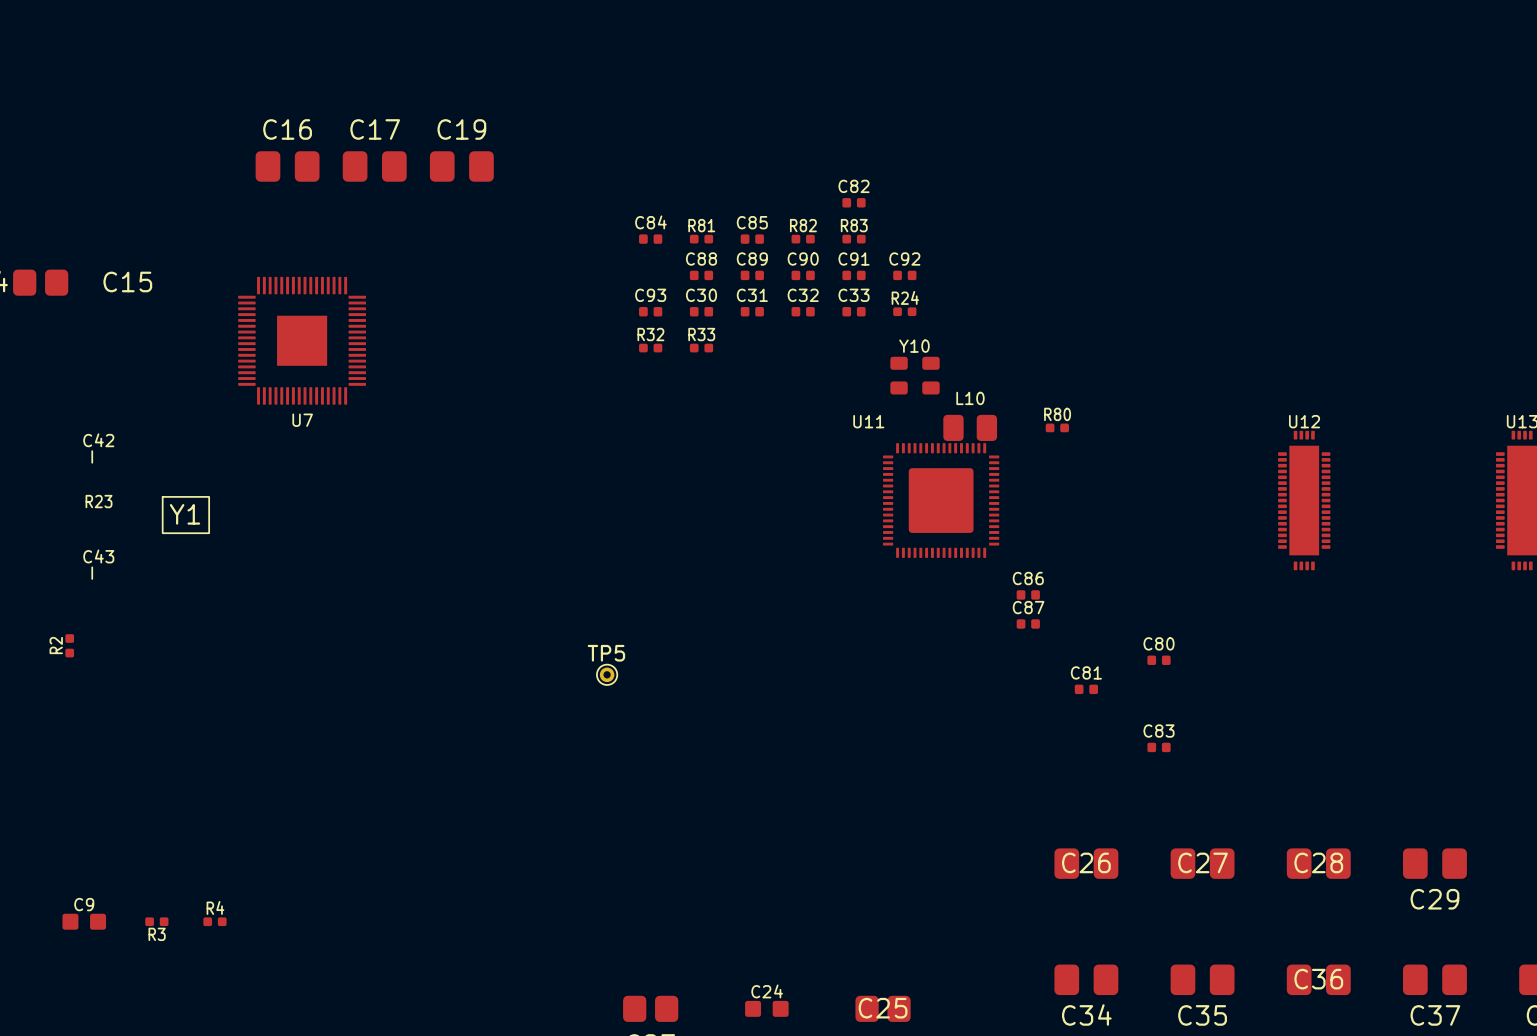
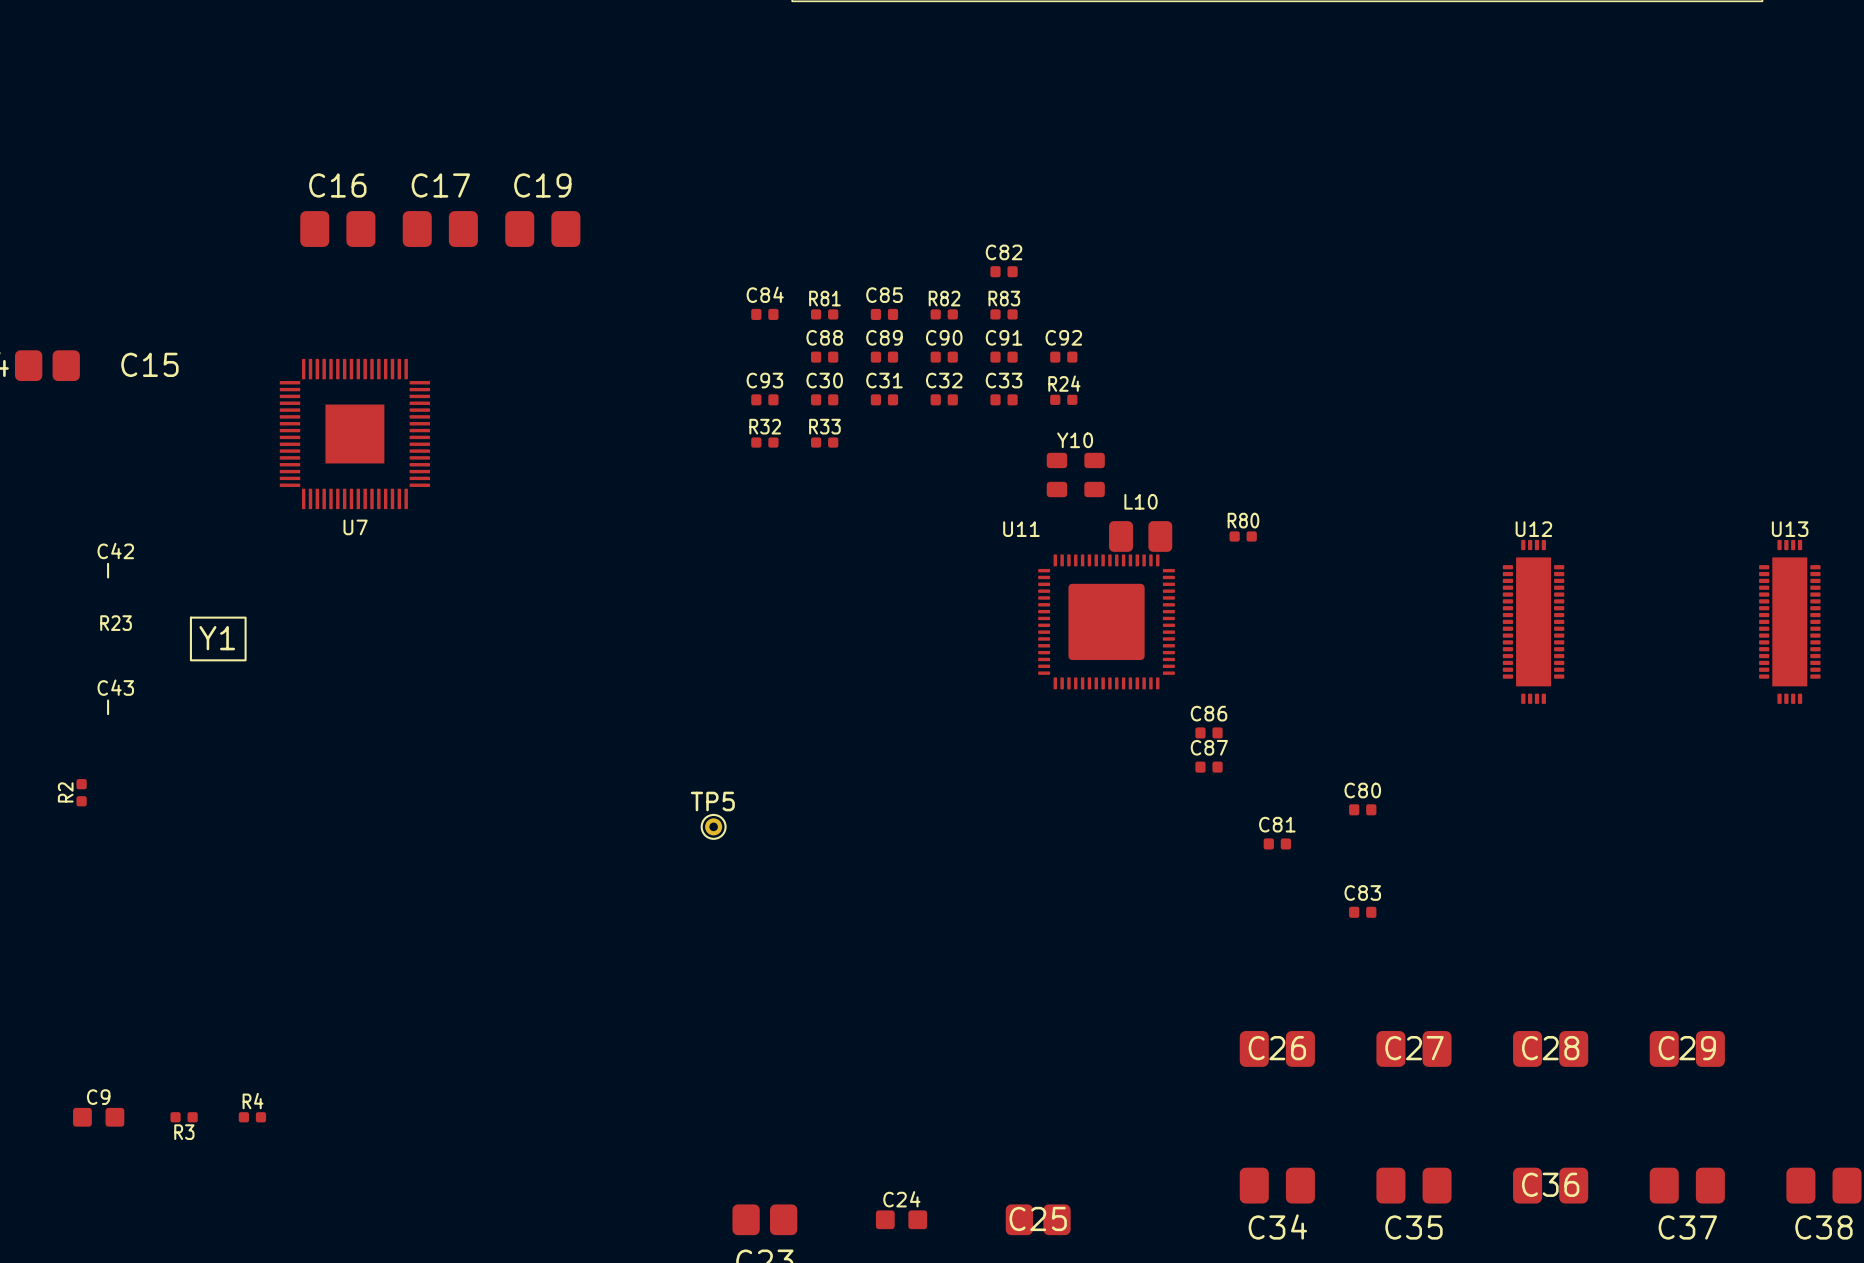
C29 name position: C29 (1434, 899) -> C29 (1687, 1048)

